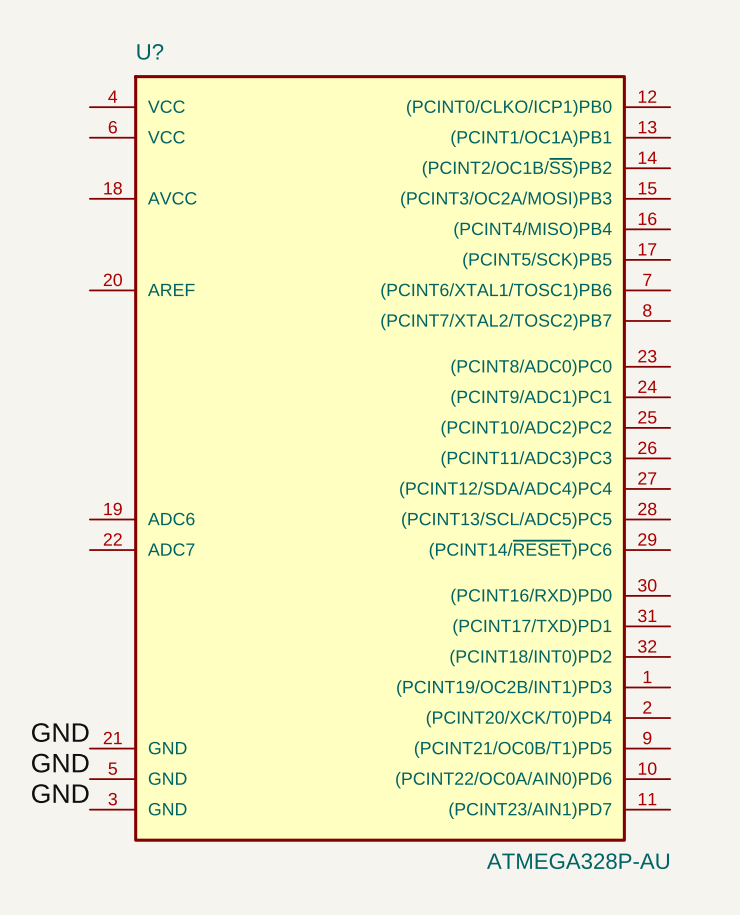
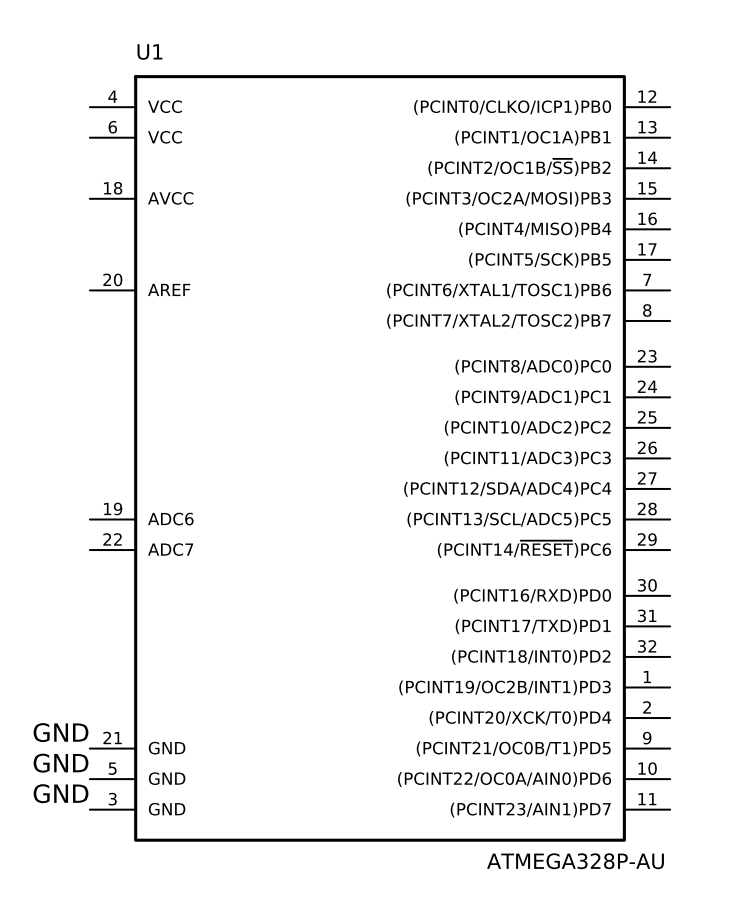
U? name: U? (150, 51) -> U1 (149, 52)

